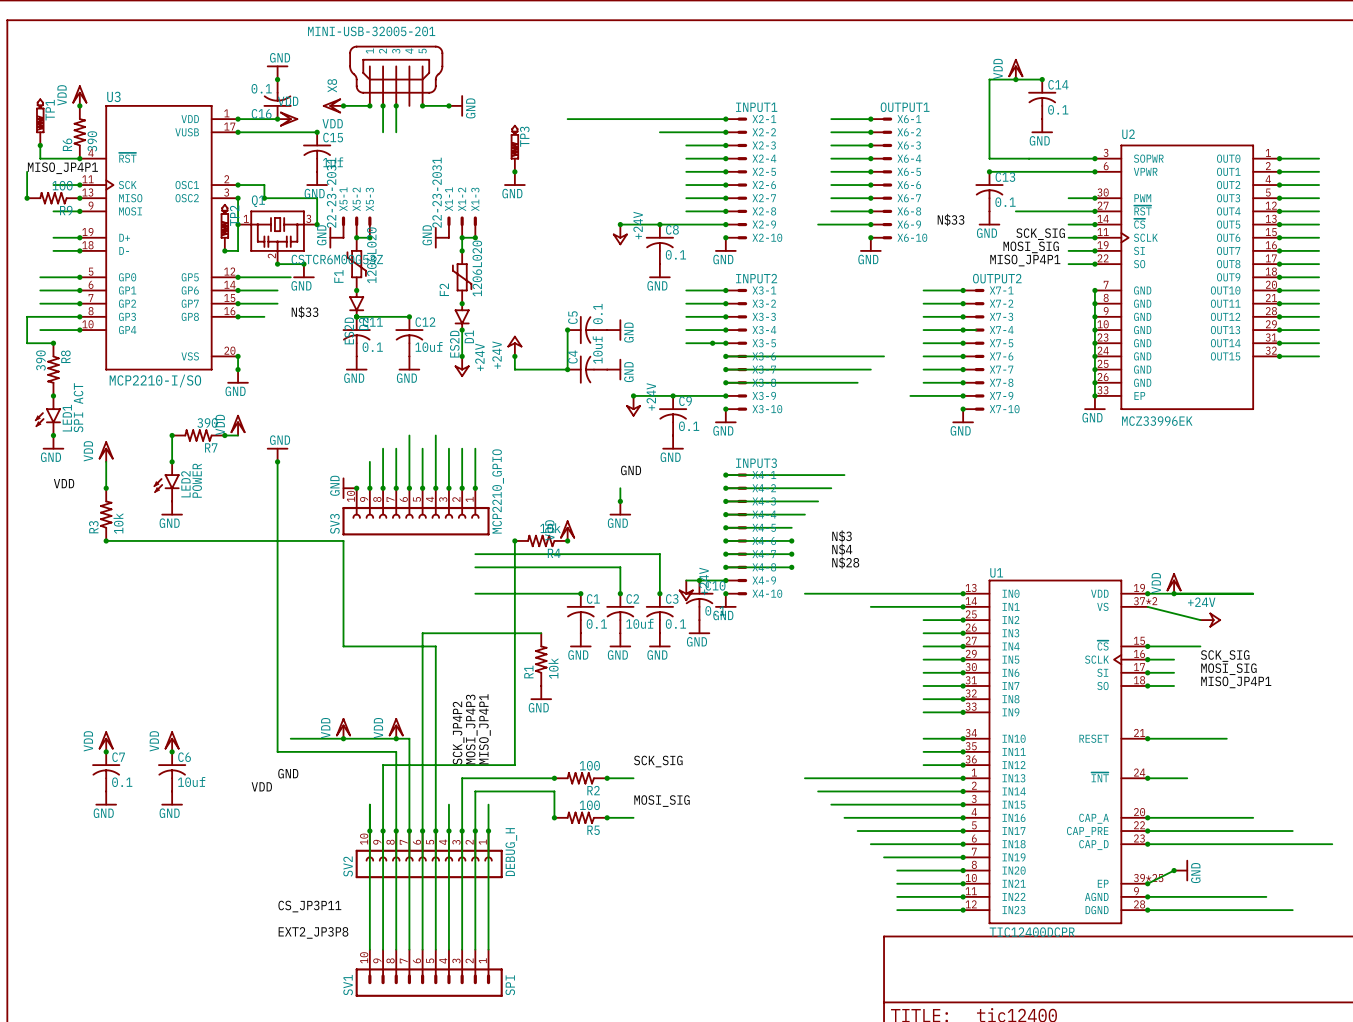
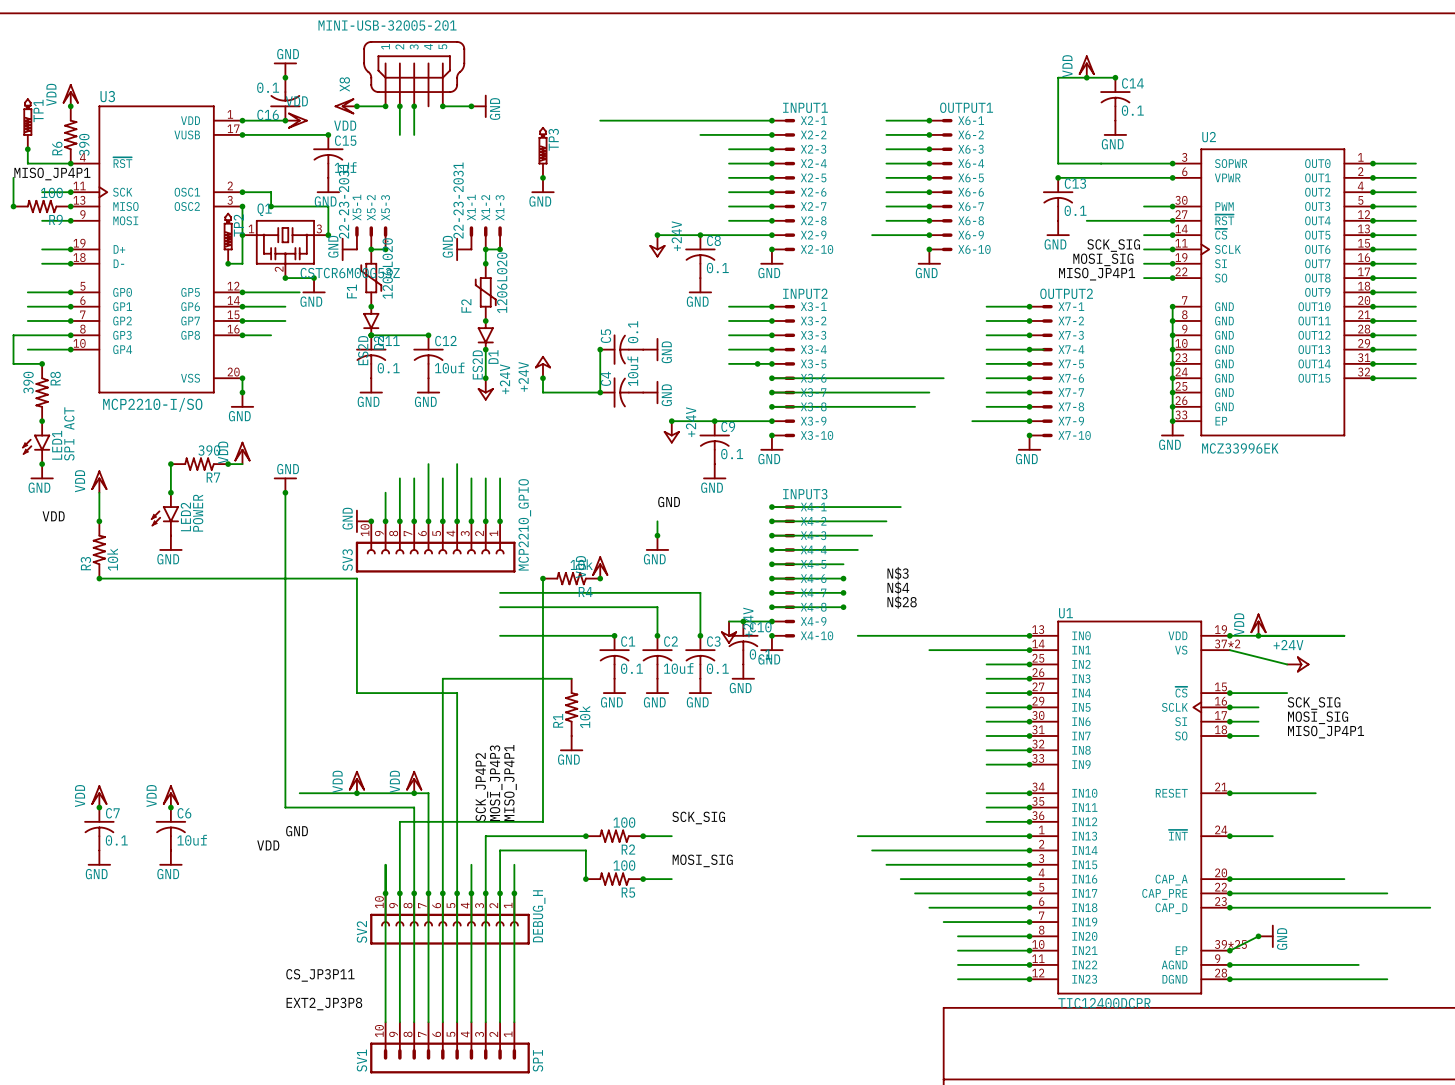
label: N$33 (951, 219) -> none
label: N$33 (305, 312) -> none

